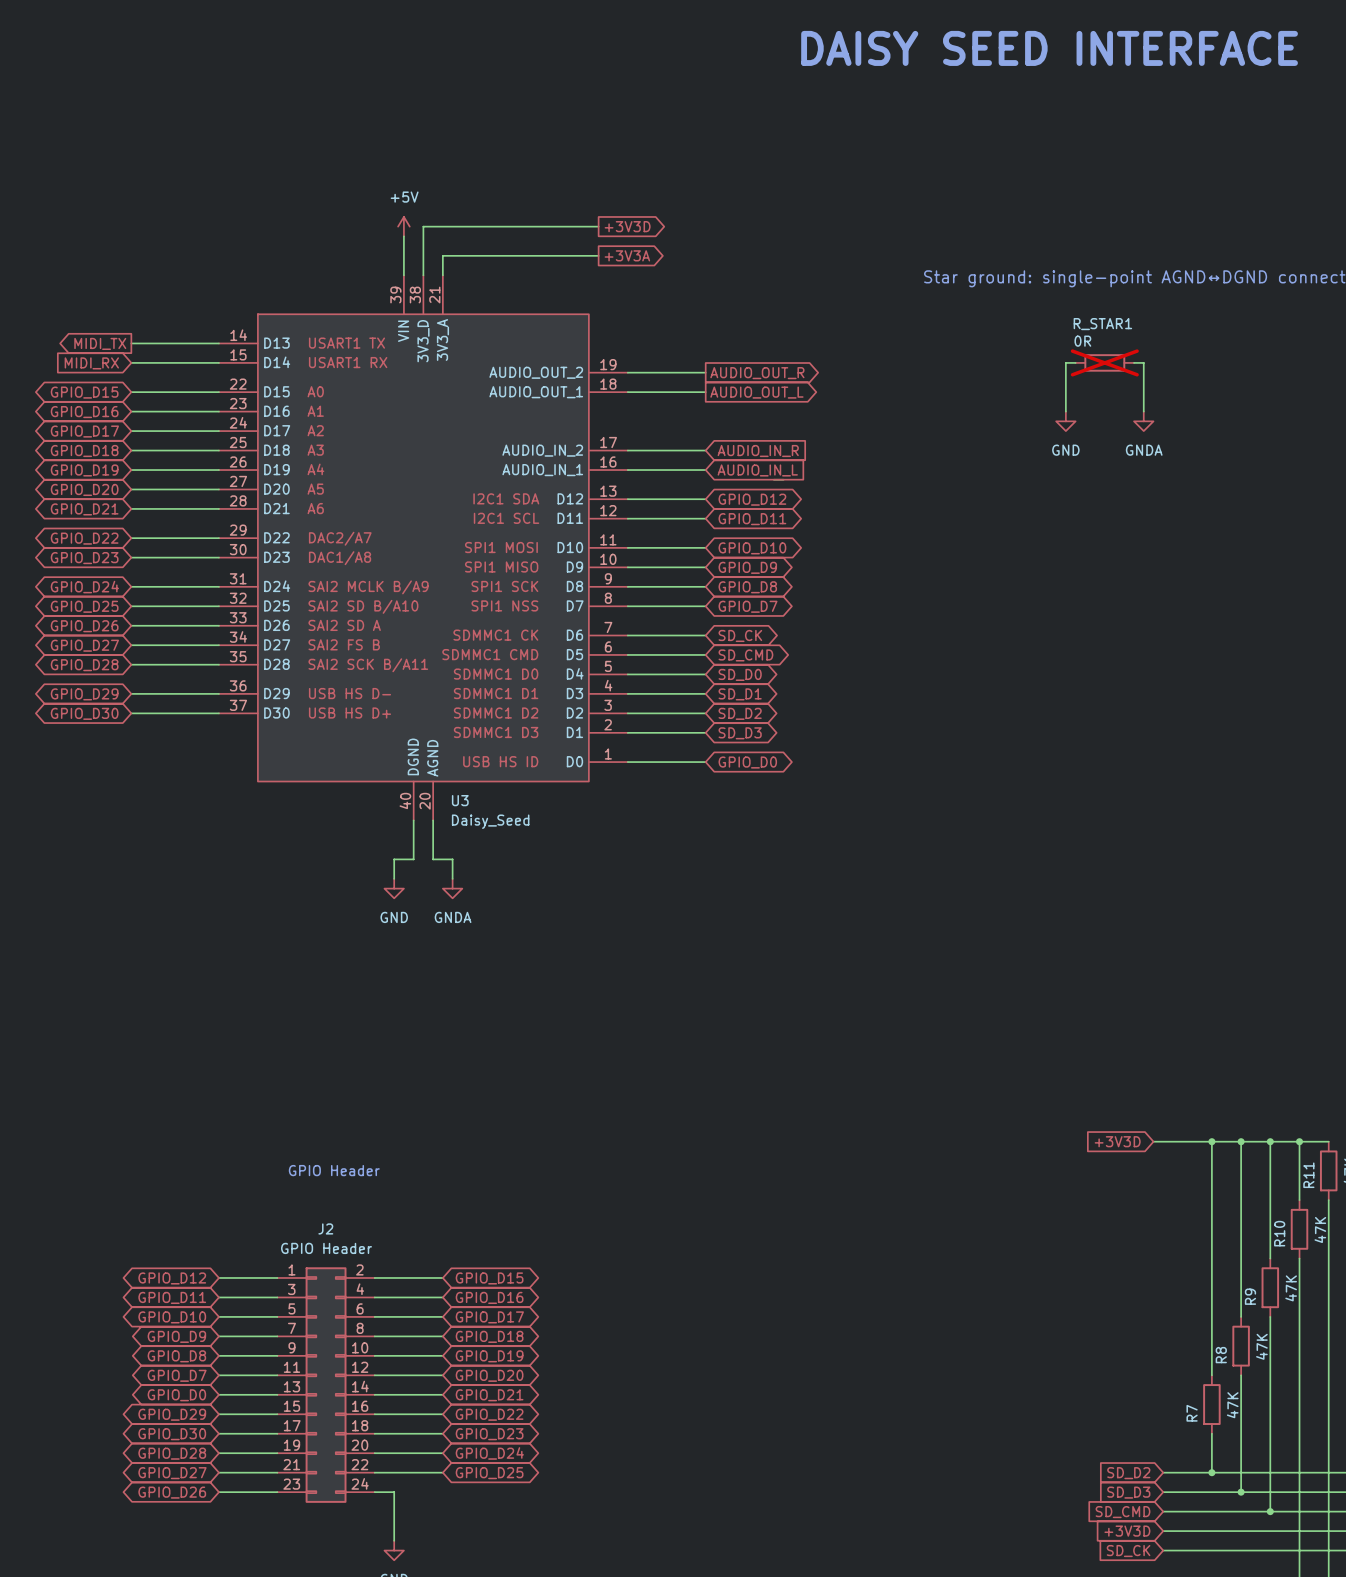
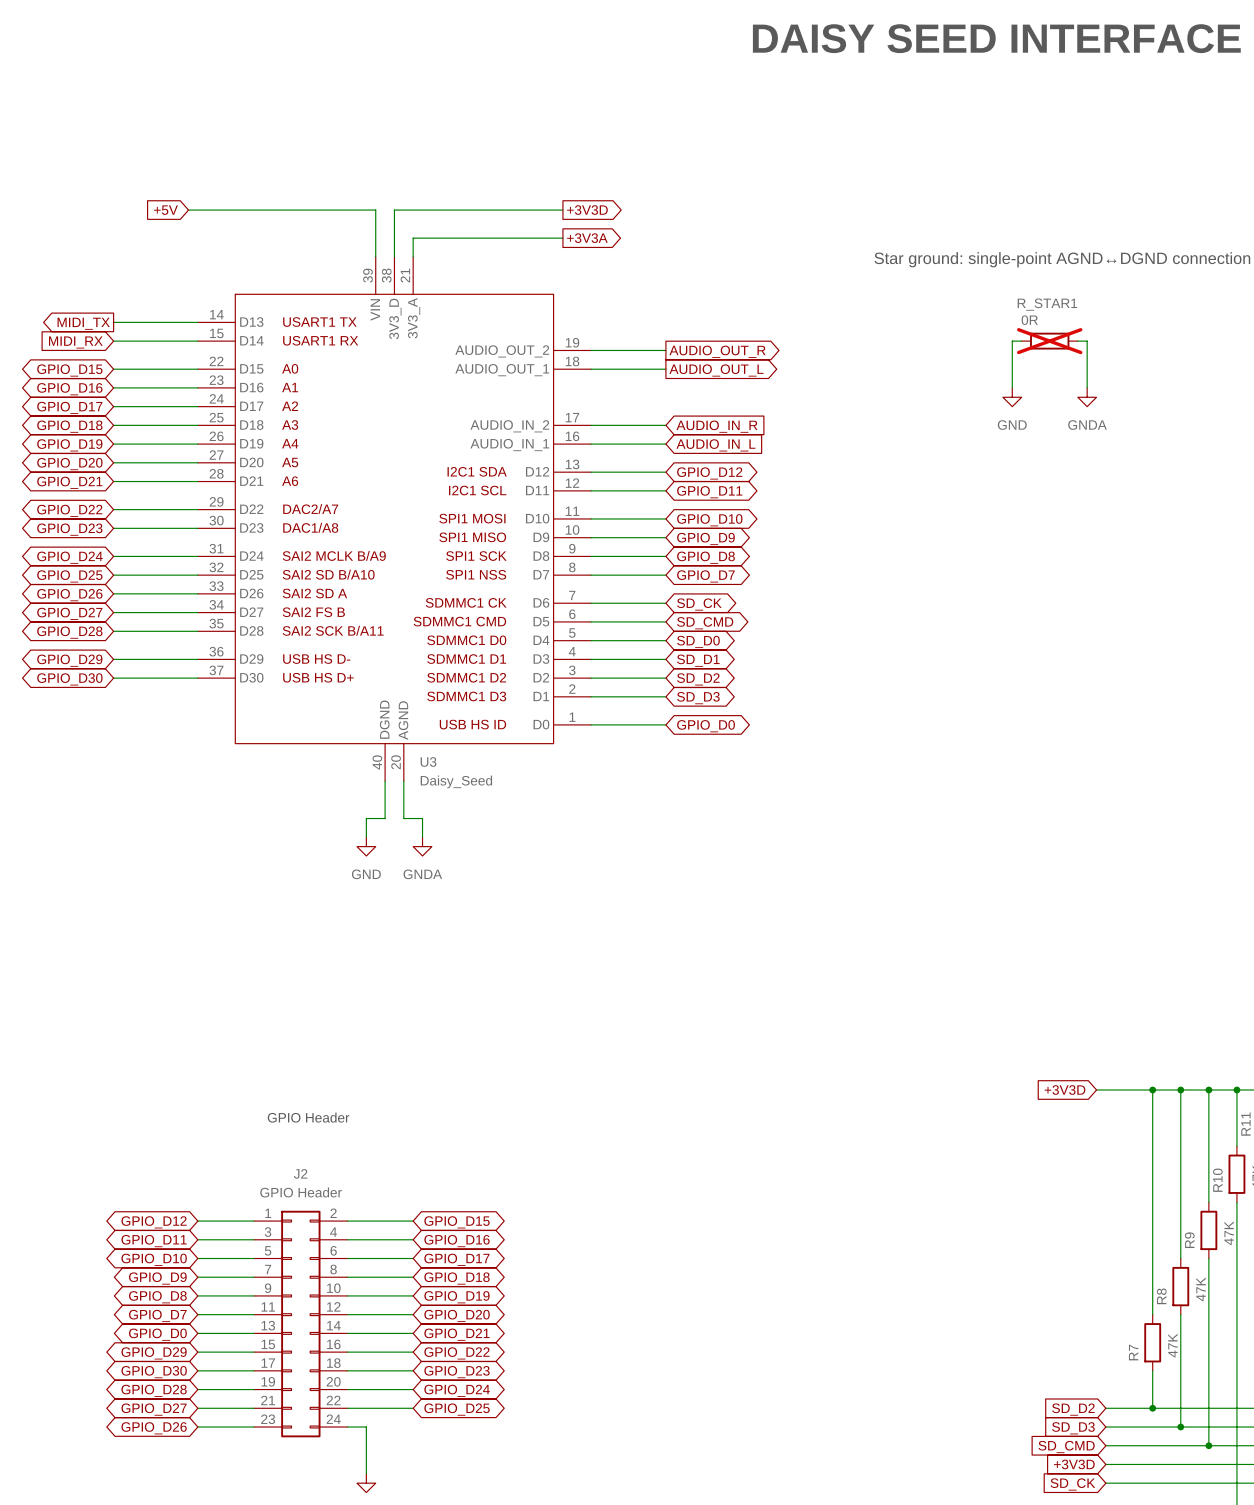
global label: none -> +5V (165, 210)
wire: none -> (188, 210) (375, 210) (375, 219)
power symbol: +5V (403, 226) -> none

